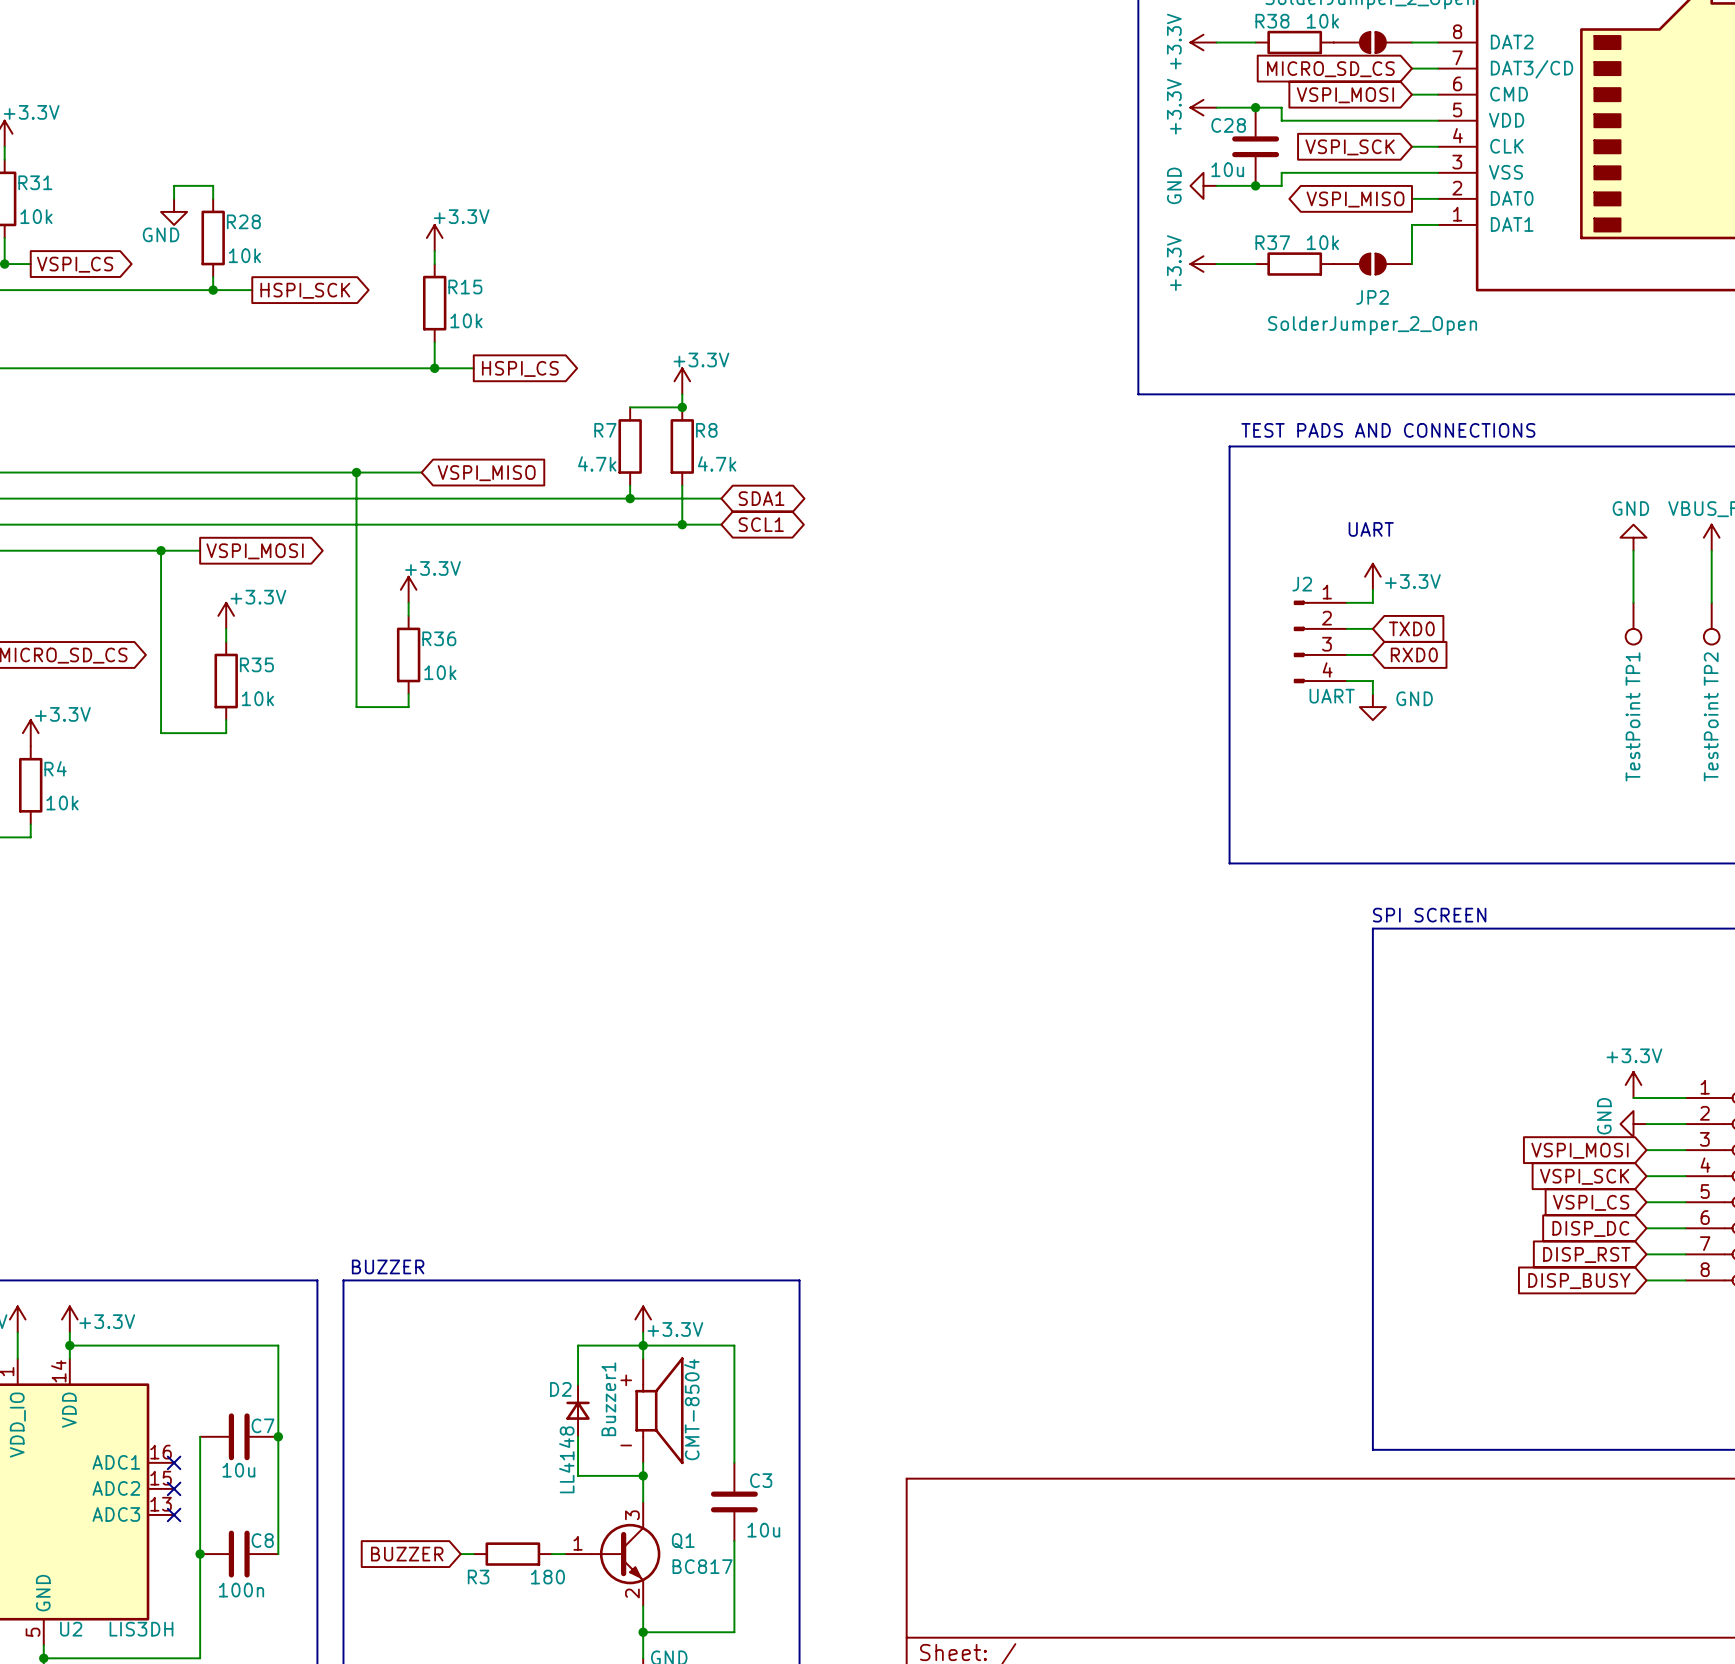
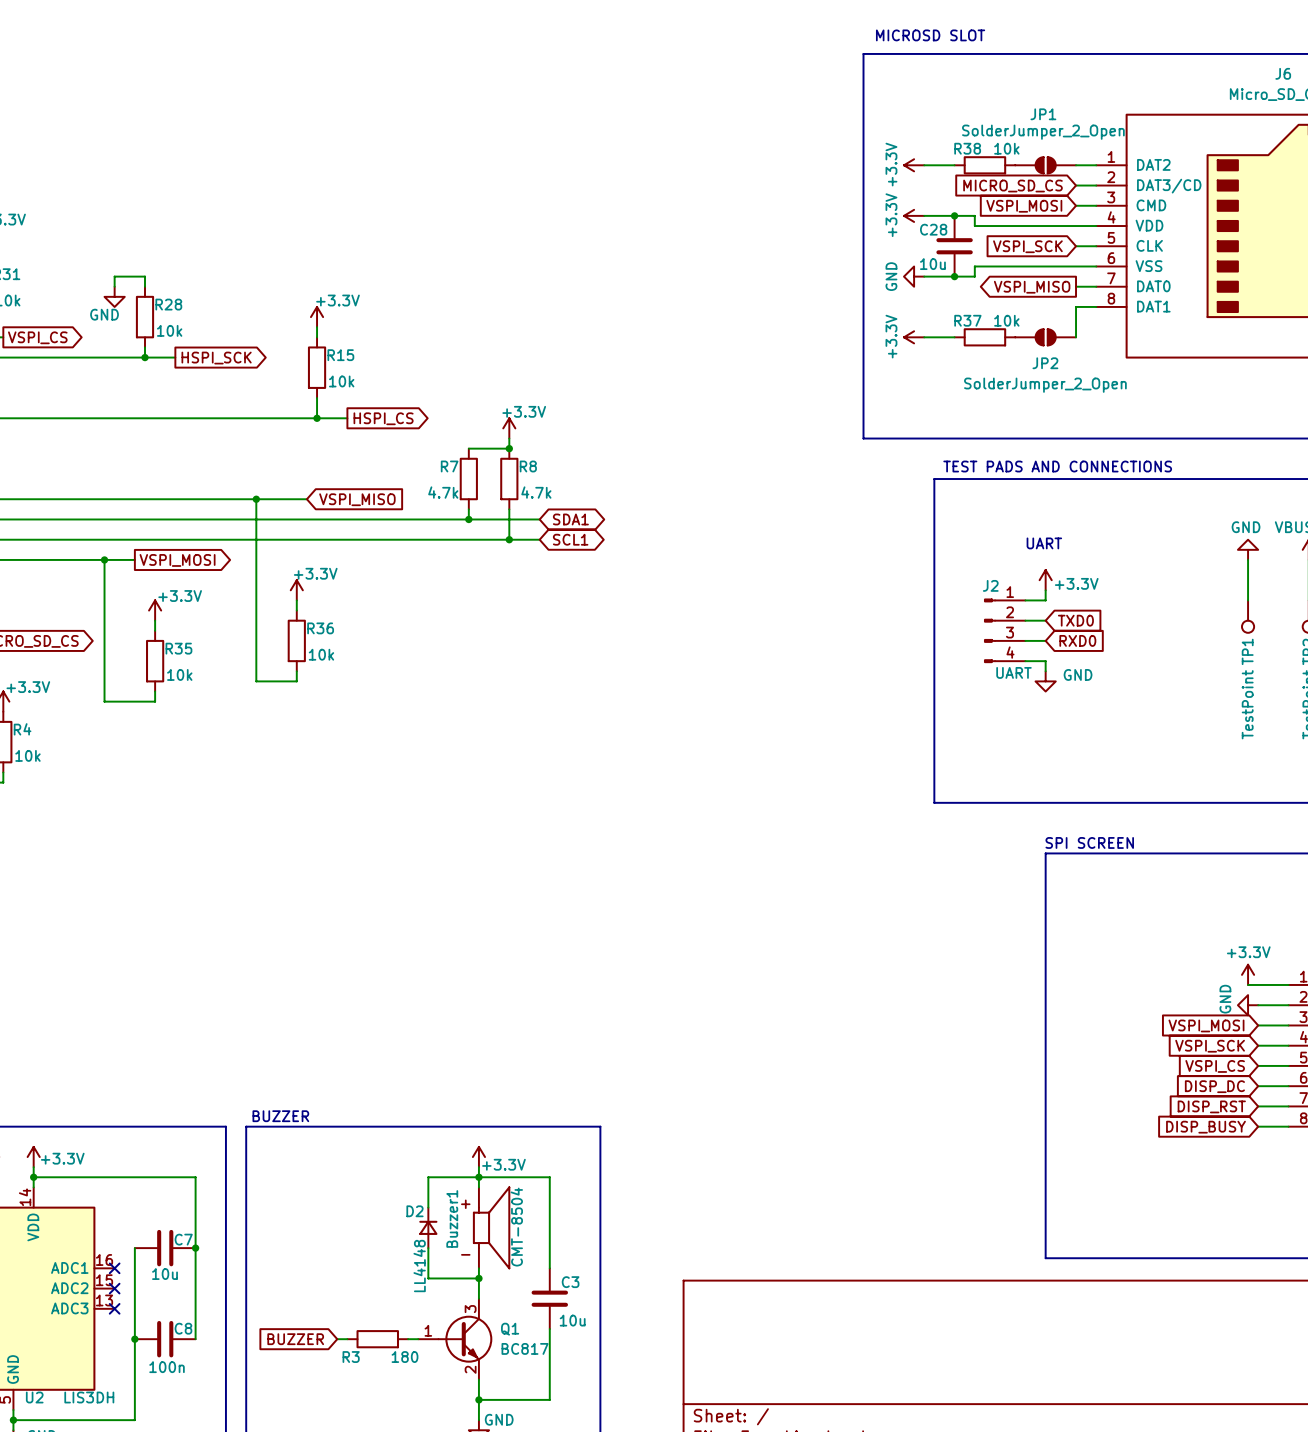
J6 pin number: 8 (1457, 31) -> 1 (1111, 156)
J6 pin number: 7 (1457, 57) -> 2 (1111, 177)
J6 pin number: 6 (1457, 83) -> 3 (1111, 197)
J6 pin number: 5 (1457, 109) -> 4 (1111, 217)
J6 pin number: 4 (1457, 135) -> 5 (1111, 237)
J6 pin number: 3 (1457, 162) -> 6 (1111, 258)
J6 pin number: 2 (1457, 188) -> 7 (1111, 278)
J6 pin number: 1 (1457, 214) -> 8 (1111, 298)

